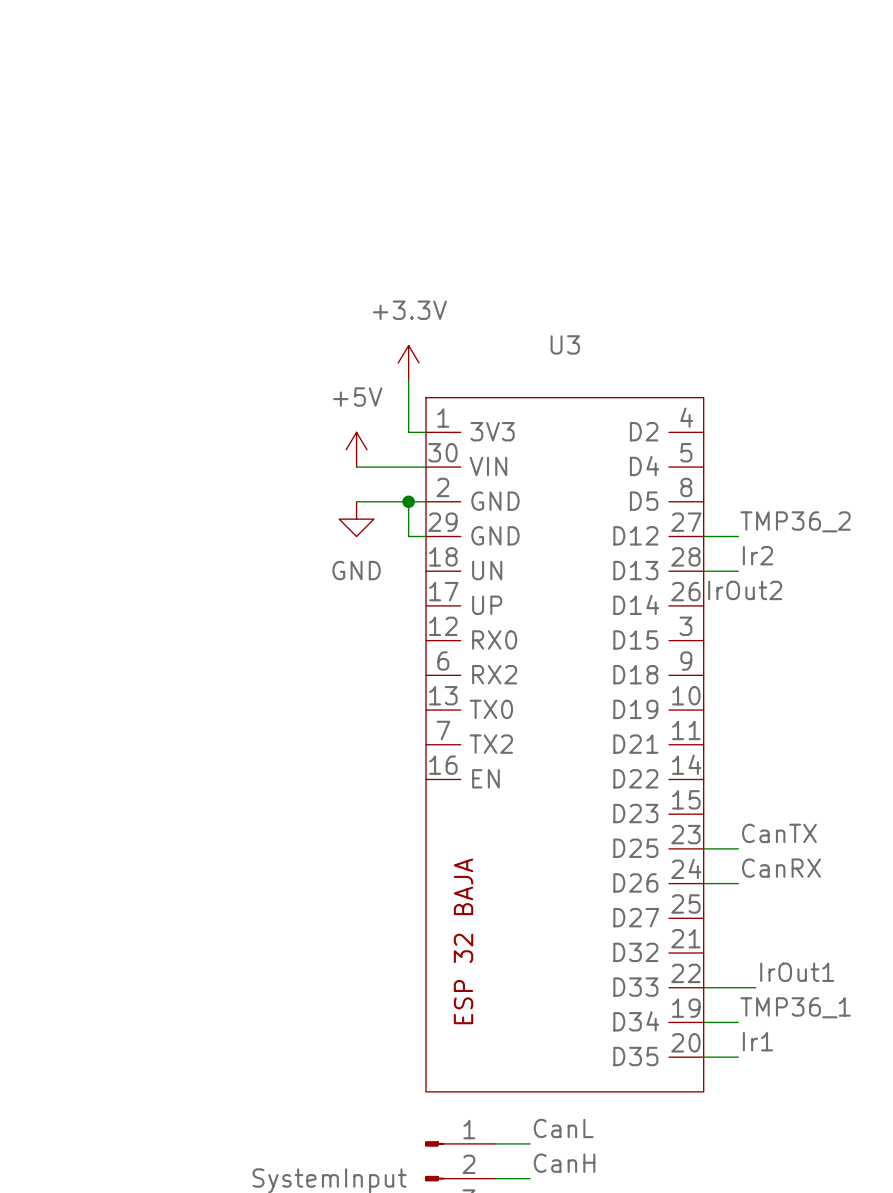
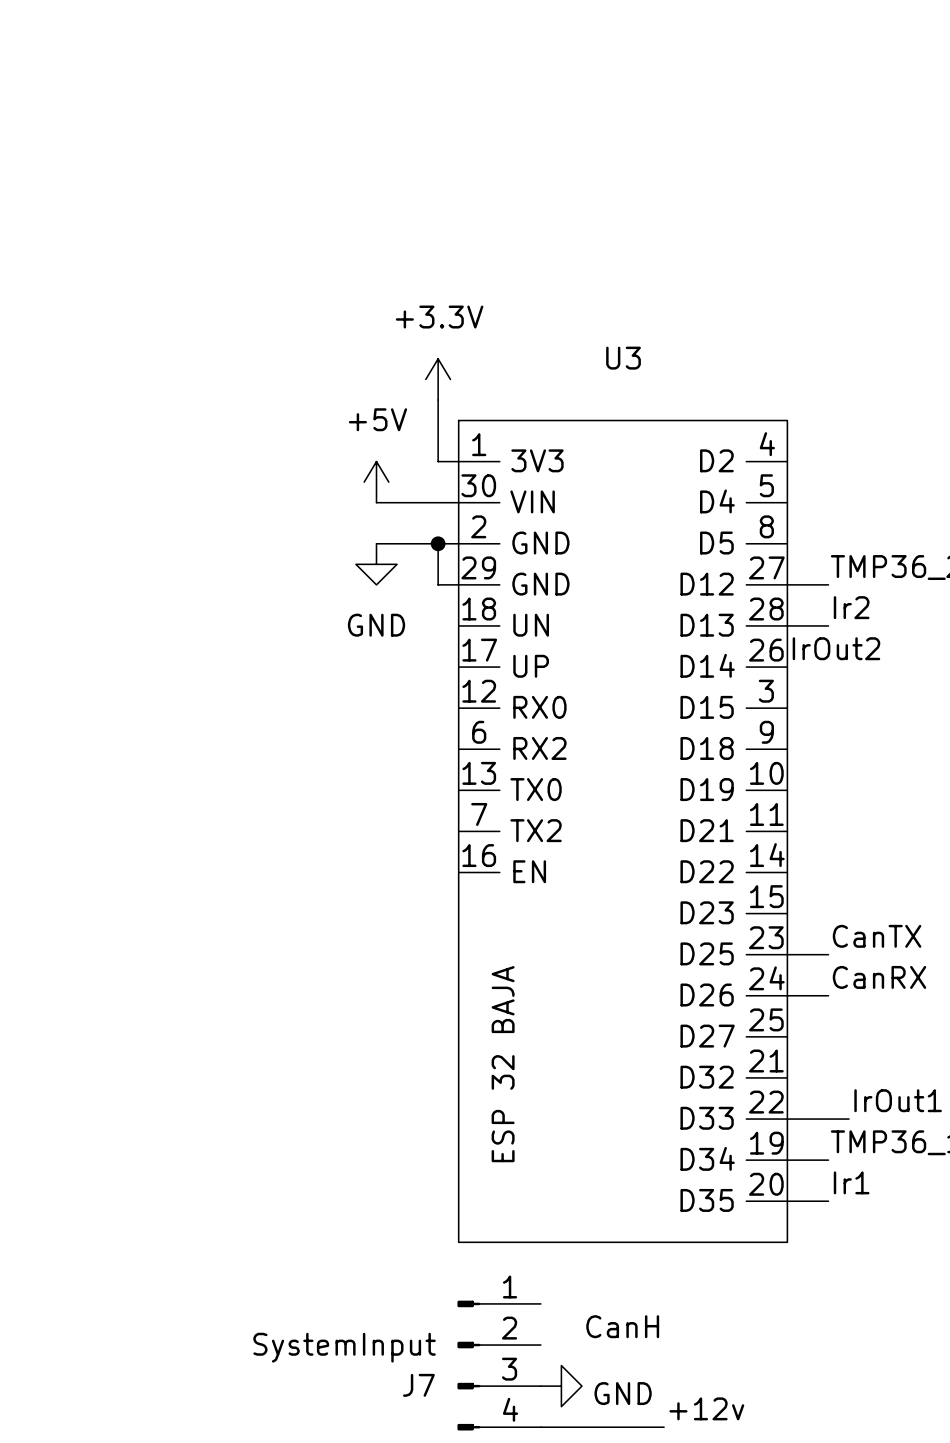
label: CanL (563, 1128) -> none
wire: (495, 1143) (530, 1143) -> none
wire: (495, 1178) (530, 1178) -> none

